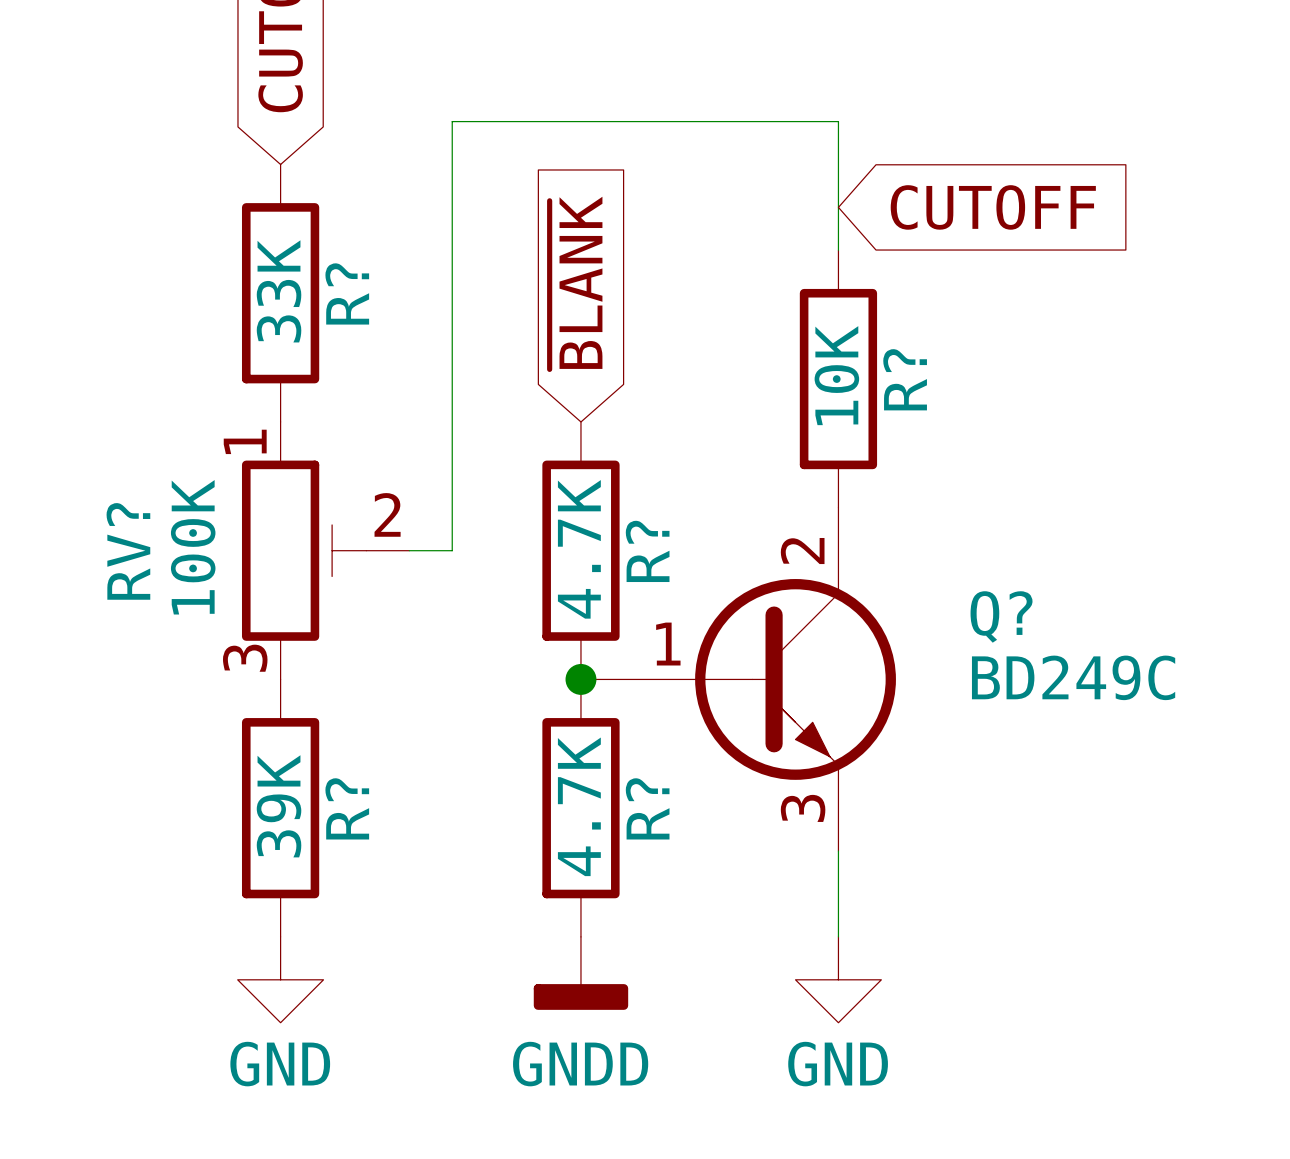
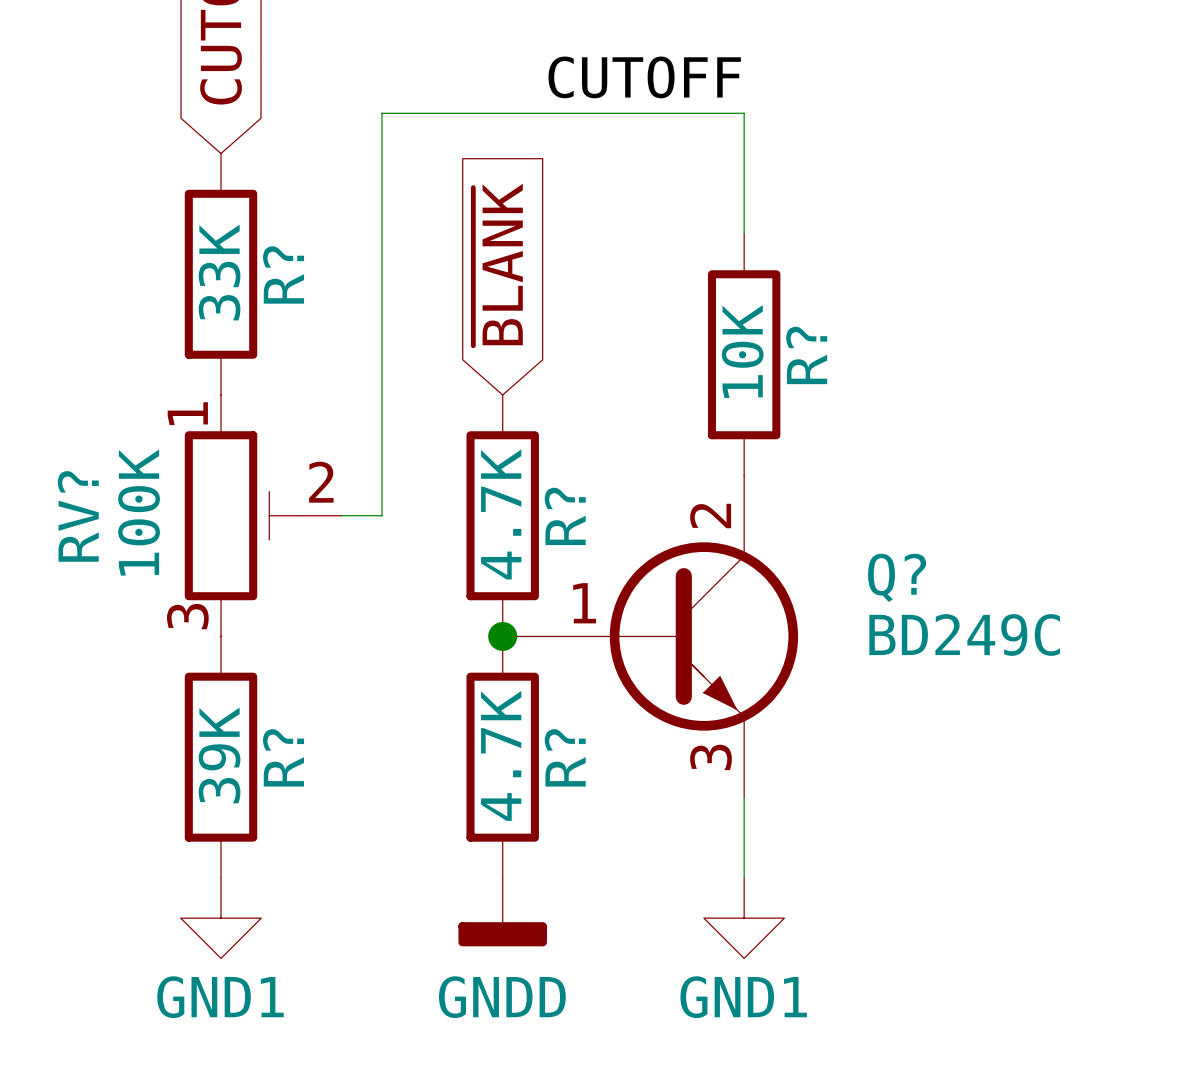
label: none -> CUTOFF (644, 77)
global label: CUTOFF (993, 207) -> none
power symbol: GND (280, 979) -> GND1 (221, 918)
power symbol: GND (838, 979) -> GND1 (744, 918)

